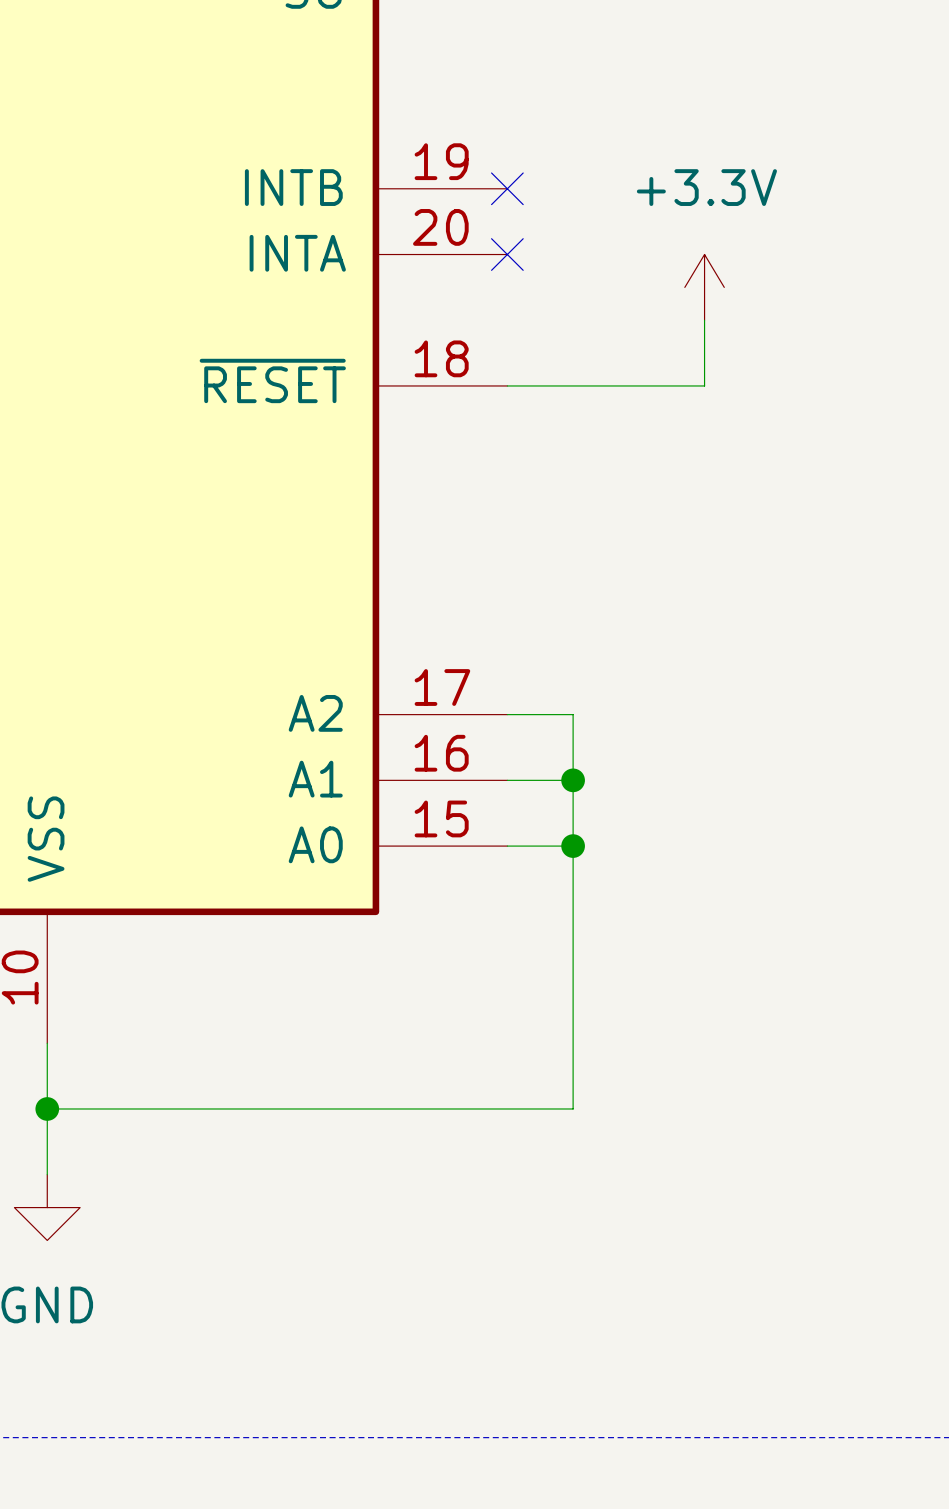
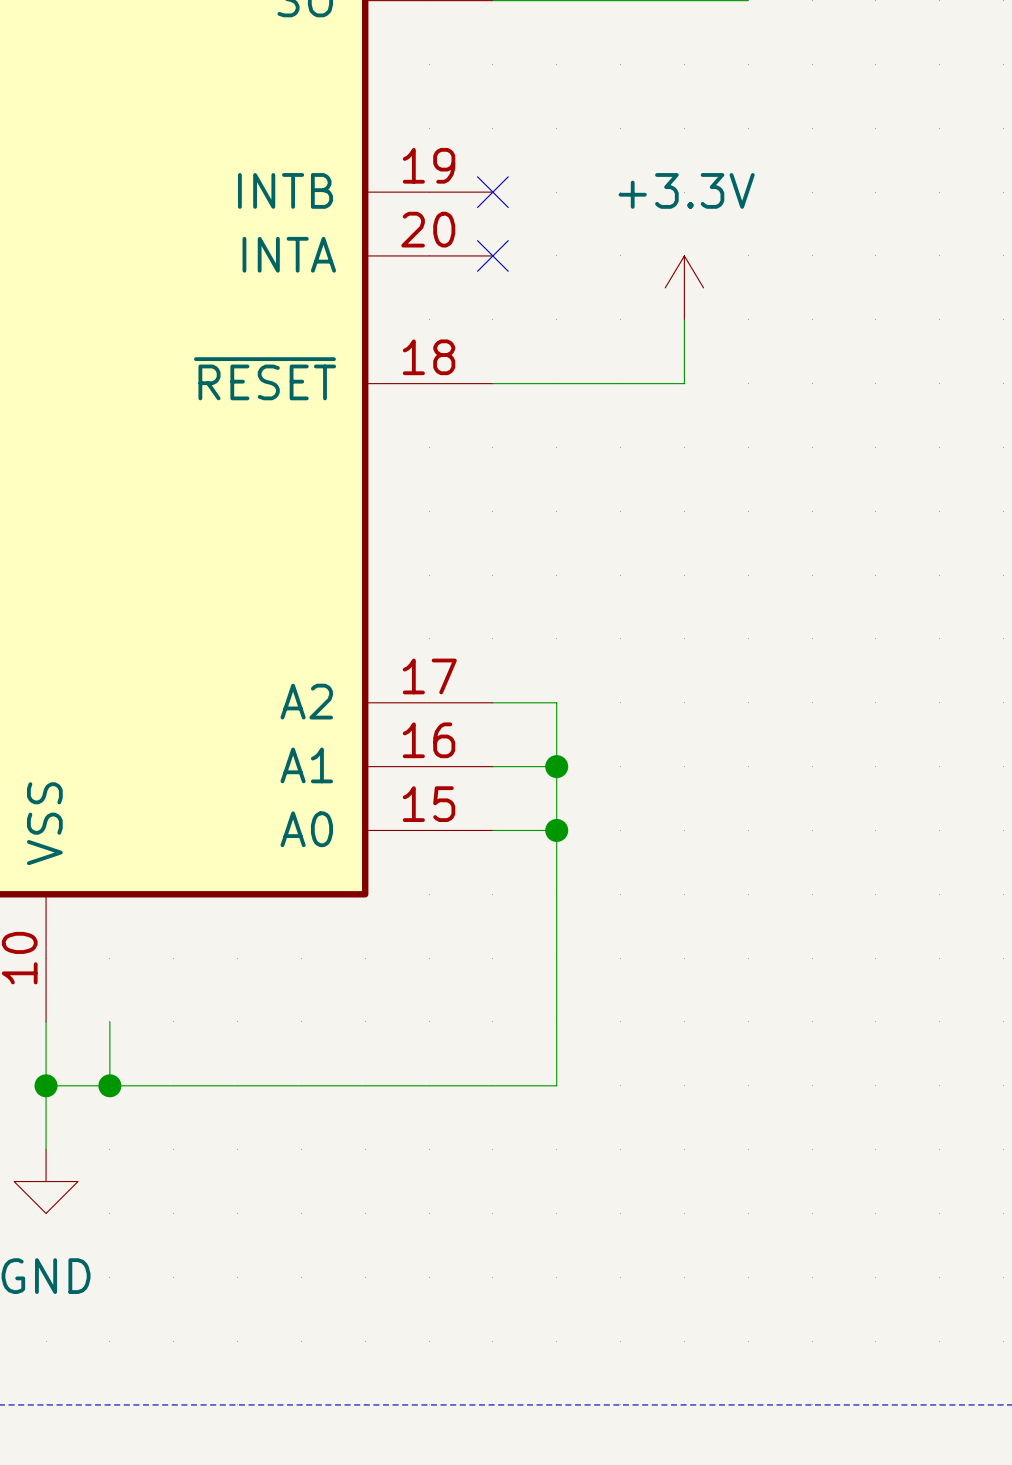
wire: none -> (109, 1021) (109, 1085)
junction: none -> (109, 1085)

